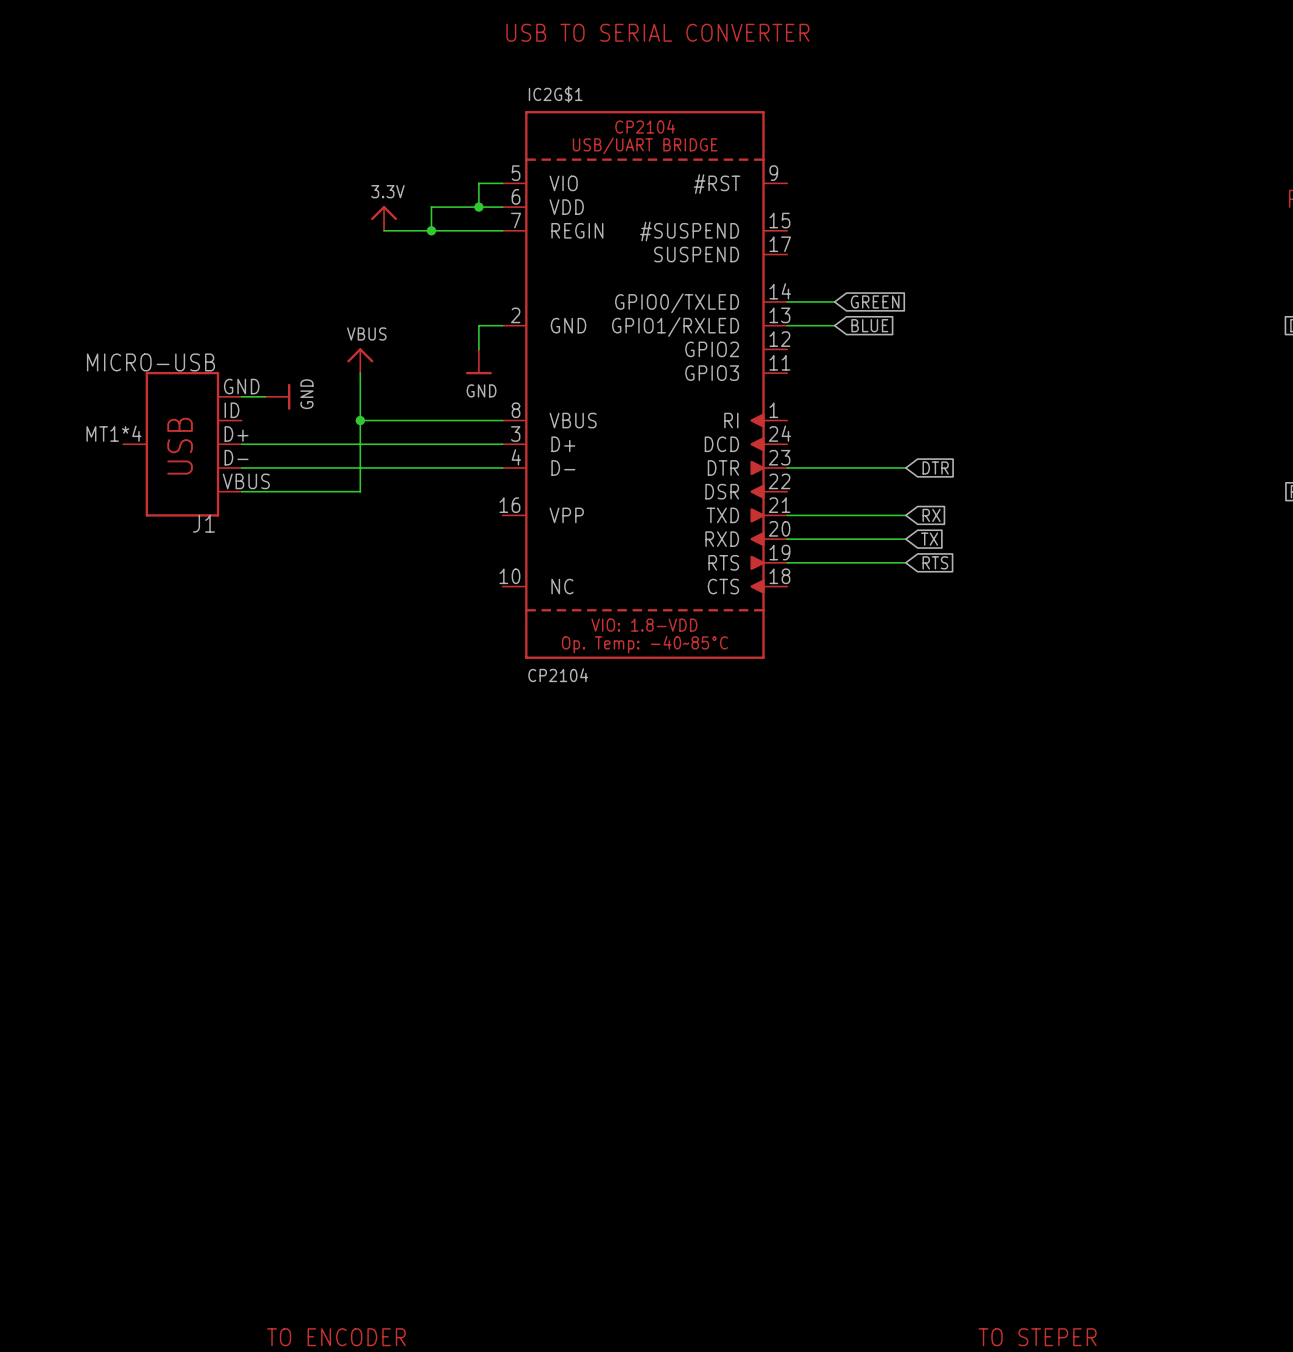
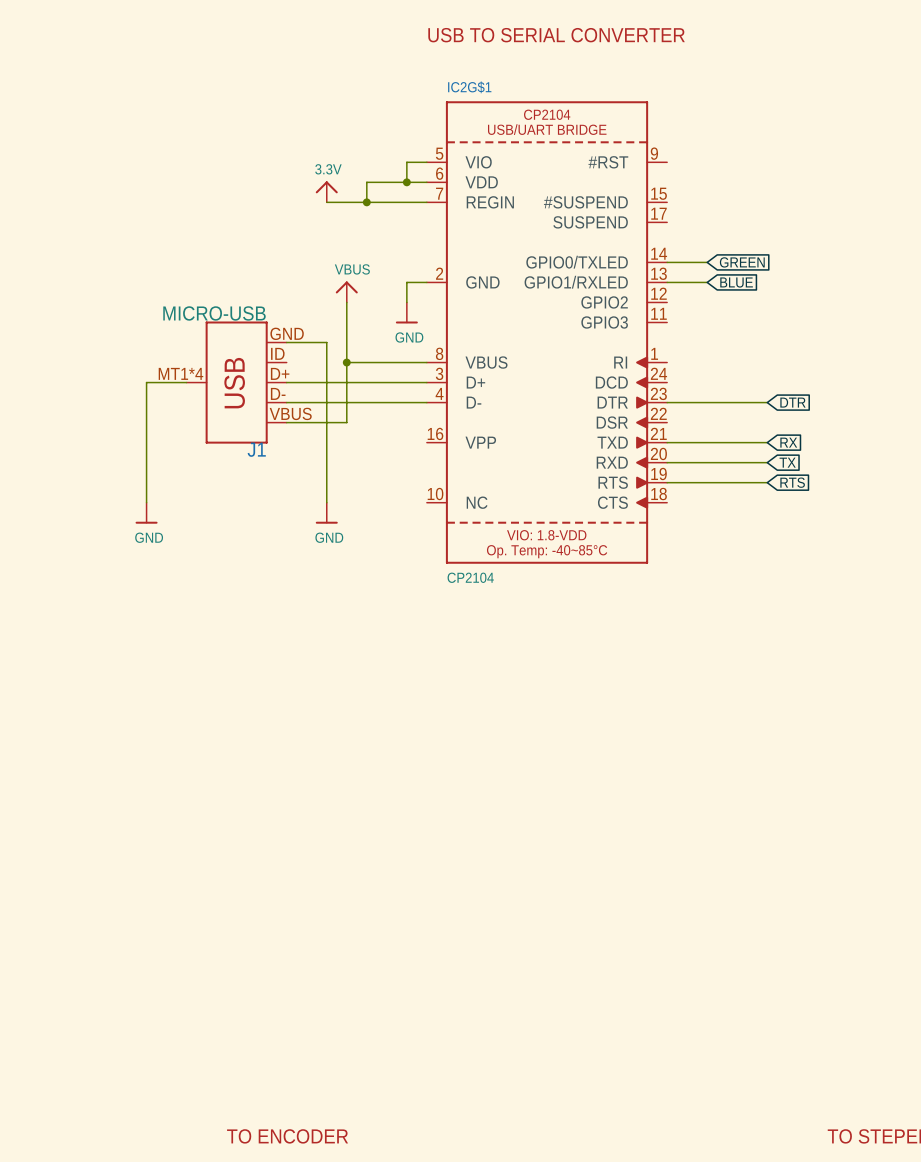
power symbol position: VBUS (360, 360) -> VBUS (346, 291)
wire: (360, 373) (360, 491) -> (346, 302) (346, 422) (306, 422)
wire: (241, 396) (265, 396) -> none
power symbol: GND (277, 396) -> none
wire: none -> (286, 342) (326, 342) (326, 502)
wire: (360, 420) (407, 420) -> none
junction position: (360, 420) -> (346, 362)
J1 position: (182, 444) -> (236, 382)
wire: none -> (186, 382) (146, 382) (146, 502)
wire: (241, 444) (336, 444) -> none
wire: (241, 467) (336, 467) -> none
wire: (241, 491) (336, 491) -> none
power symbol: none -> GND (146, 513)
power symbol: none -> GND (326, 513)

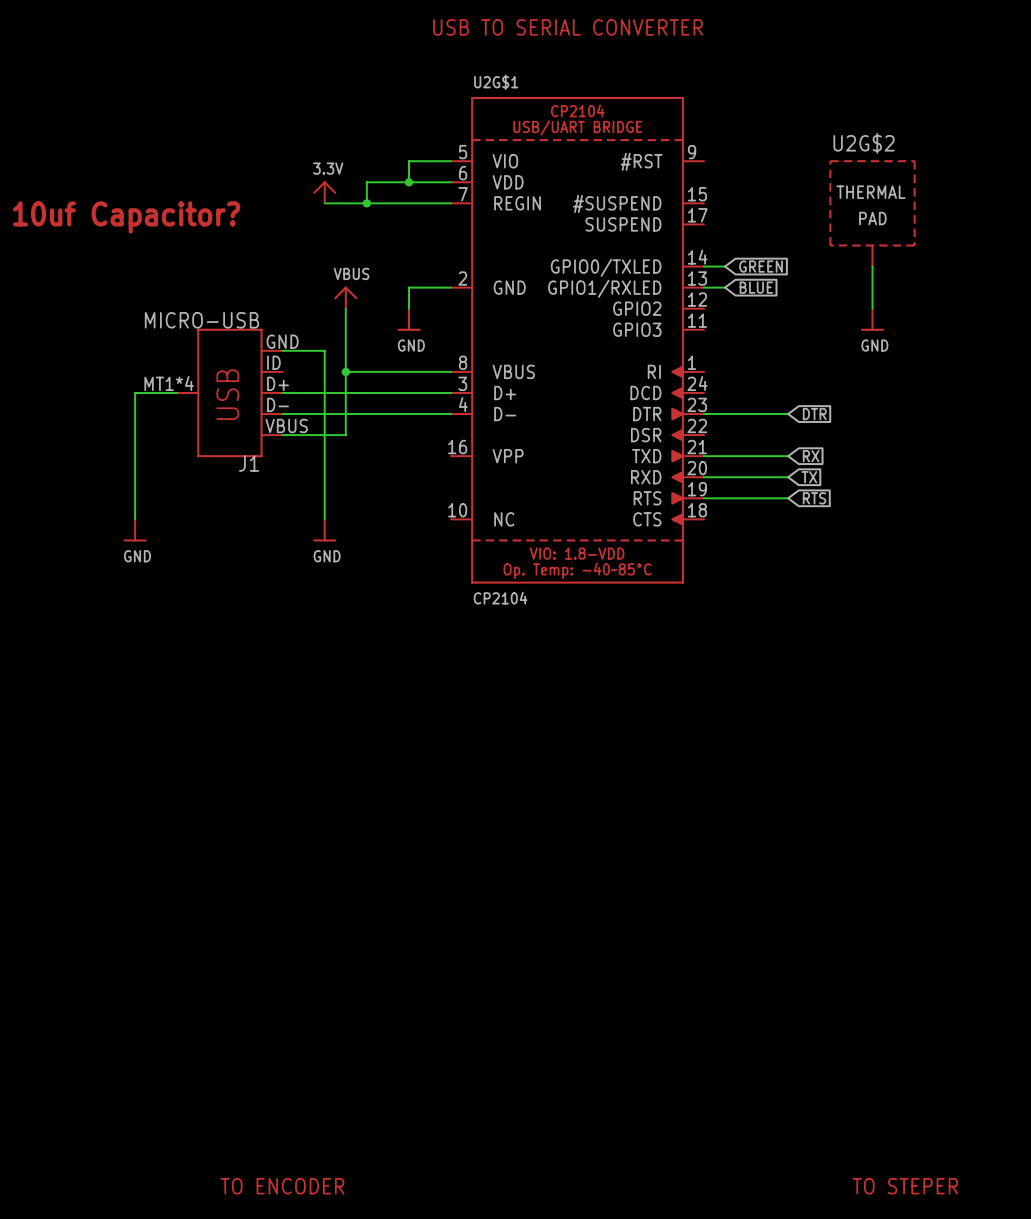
U2G$2: none -> (872, 213)
text: none -> 10uf Capacitor? (126, 217)
wire: none -> (872, 266) (872, 308)
power symbol: none -> GND (872, 319)
IC2G$1: CP2104 (547, 332) -> none
U2G$1: none -> CP2104 (577, 340)

